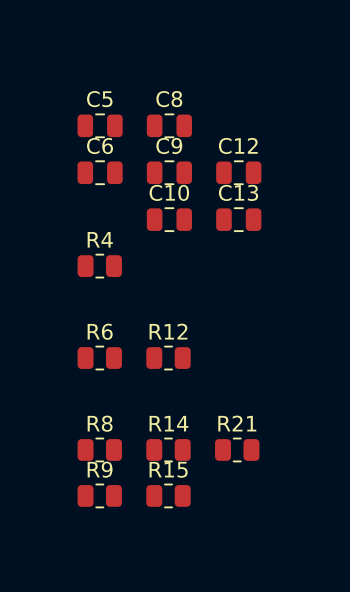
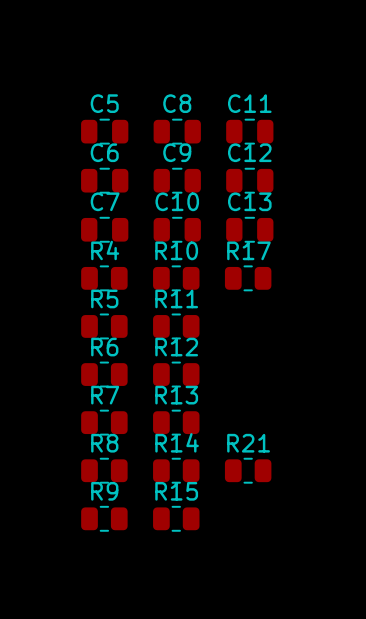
C11: none -> (249, 131)
C7: none -> (104, 229)
R10: none -> (176, 278)
R17: none -> (248, 278)
R5: none -> (104, 326)
R11: none -> (176, 326)
R7: none -> (104, 422)
R13: none -> (176, 422)

